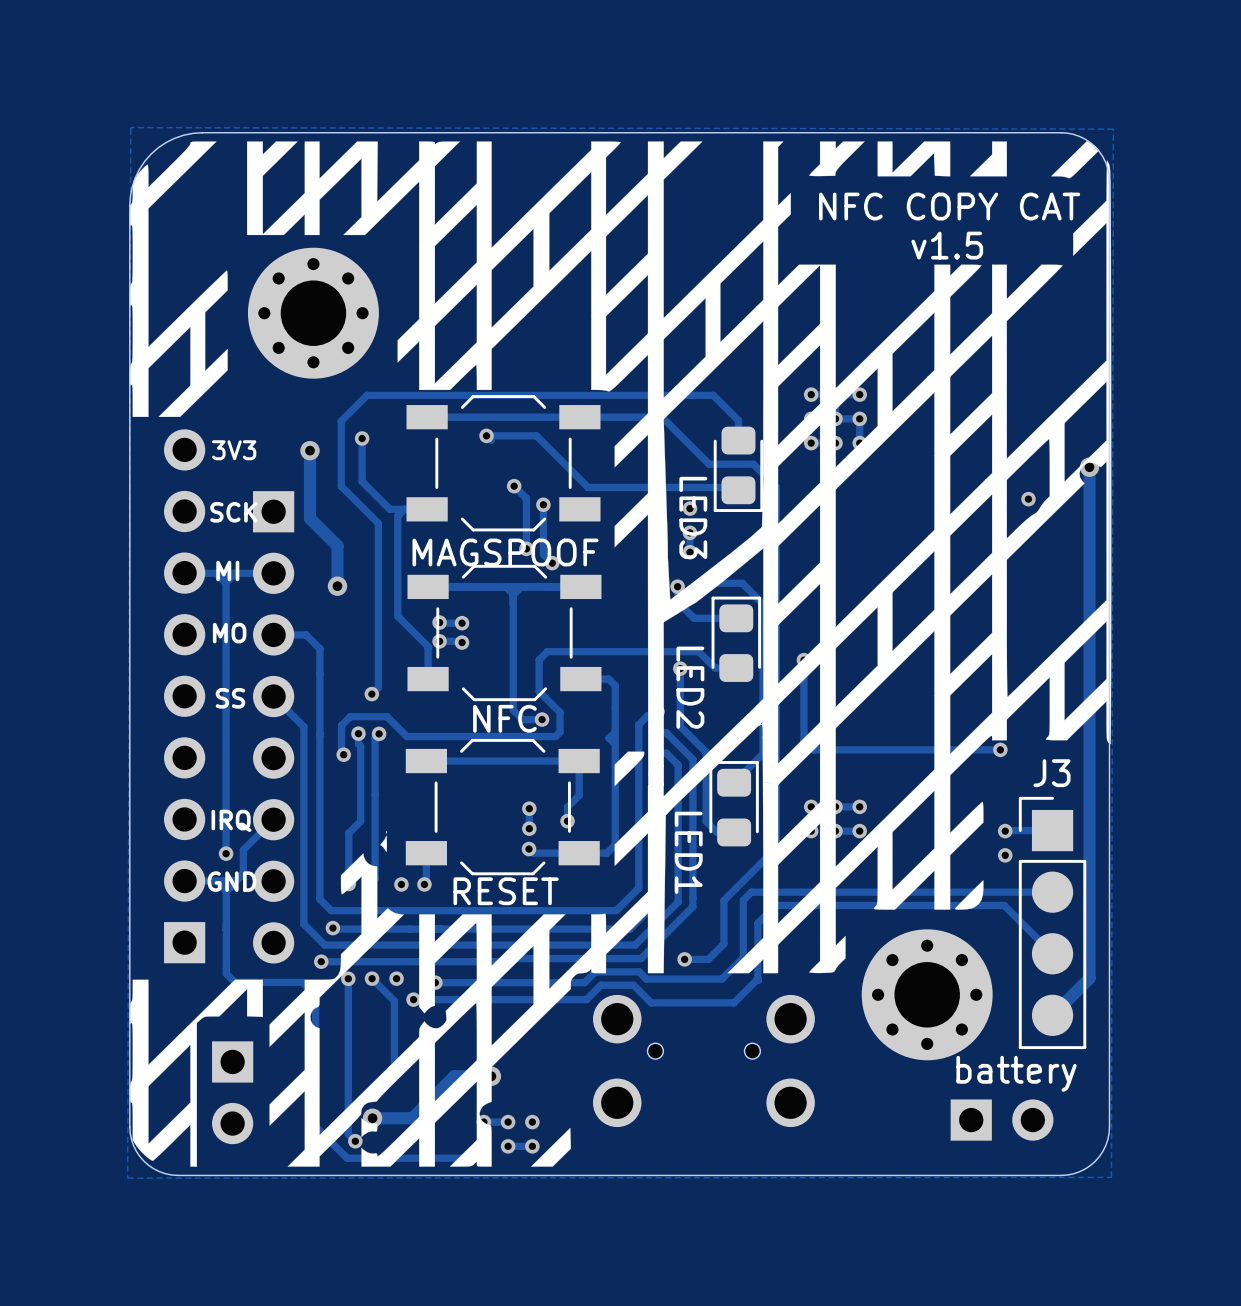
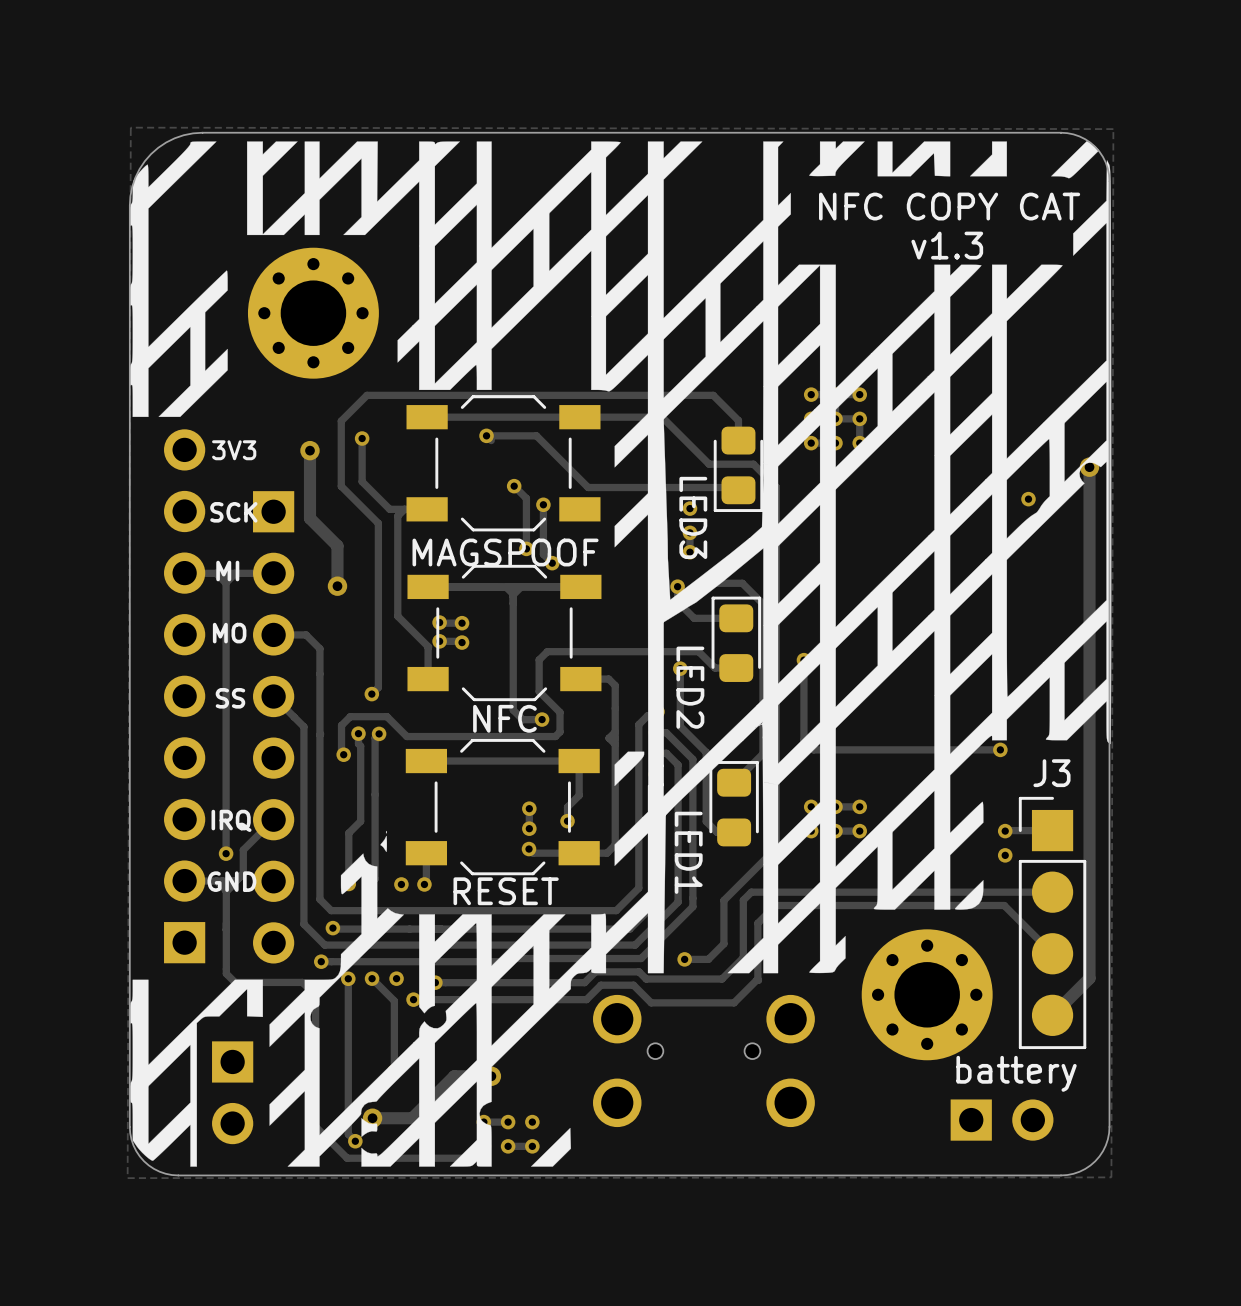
text: v1.5 (947, 245) -> v1.3 (947, 245)

